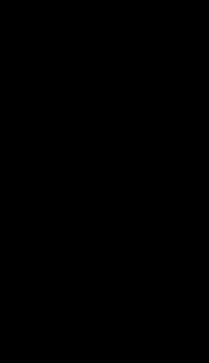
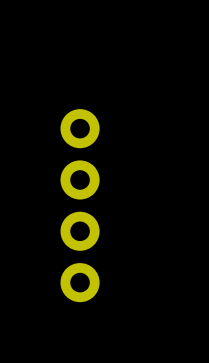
part: none -> (80, 205)

